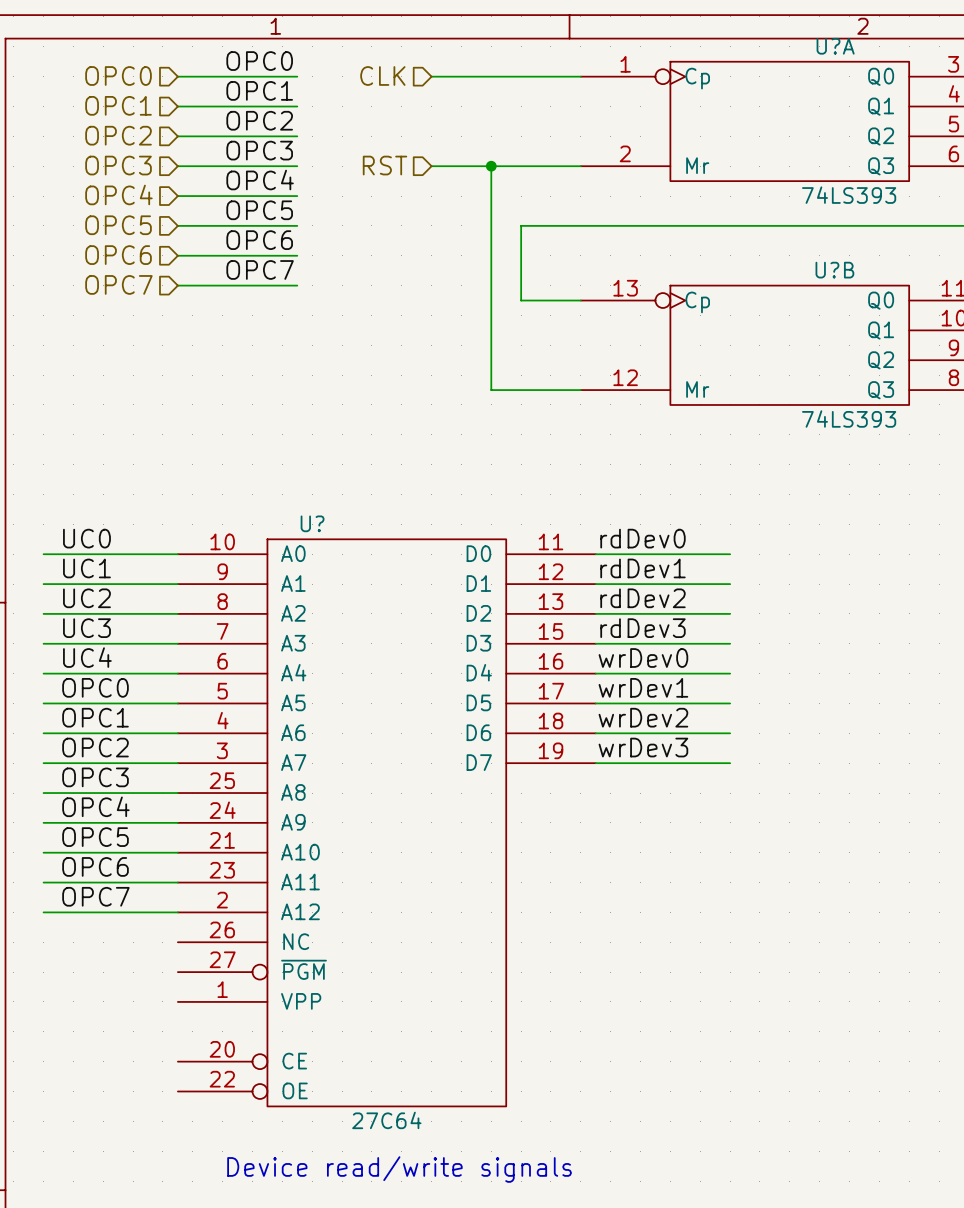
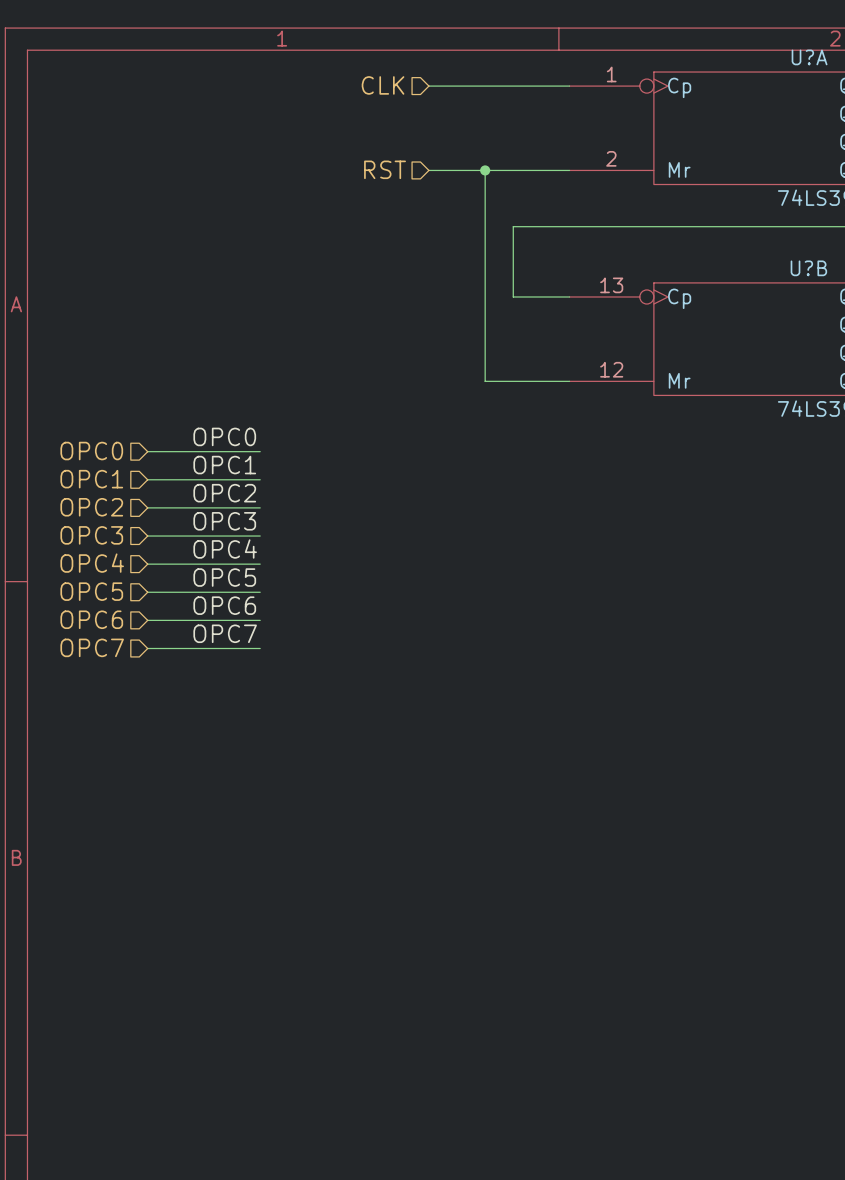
label: OPC0 (259, 61) -> none
hierarchical label: OPC0 (118, 75) -> none
wire: (177, 76) (297, 76) -> none
label: OPC1 (259, 90) -> none
hierarchical label: OPC1 (118, 105) -> none
wire: (177, 106) (297, 106) -> none
label: OPC2 (259, 120) -> none
hierarchical label: OPC2 (118, 135) -> none
wire: (177, 136) (297, 136) -> none
label: OPC3 (259, 150) -> none
hierarchical label: OPC3 (118, 165) -> none
wire: (177, 166) (297, 166) -> none
label: OPC4 (260, 180) -> none
hierarchical label: OPC4 (118, 194) -> none
wire: (177, 196) (297, 196) -> none
label: OPC5 (259, 210) -> none
hierarchical label: OPC5 (118, 225) -> none
wire: (177, 225) (297, 225) -> (147, 451) (260, 451)
label: OPC6 (259, 240) -> none
hierarchical label: OPC6 (118, 255) -> none
wire: (177, 255) (297, 255) -> (147, 479) (260, 479)
label: OPC7 (260, 269) -> none
hierarchical label: OPC7 (118, 284) -> none
wire: (177, 285) (297, 285) -> (147, 507) (260, 507)
label: none -> OPC0 (224, 436)
hierarchical label: none -> OPC0 (91, 451)
label: none -> OPC1 (224, 465)
hierarchical label: none -> OPC1 (91, 479)
label: none -> OPC2 (224, 493)
hierarchical label: none -> OPC2 (91, 507)
label: UC0 (86, 538) -> none
label: none -> OPC3 (224, 521)
label: rdDev0 (642, 538) -> none
hierarchical label: none -> OPC3 (91, 535)
wire: (43, 554) (133, 554) -> none
wire: (595, 554) (730, 554) -> none
label: UC1 (86, 568) -> none
label: none -> OPC4 (225, 549)
label: rdDev1 (642, 568) -> none
hierarchical label: none -> OPC4 (92, 563)
wire: (43, 584) (133, 584) -> none
wire: (595, 584) (730, 584) -> none
label: UC2 (86, 598) -> none
label: none -> OPC5 (224, 577)
label: rdDev2 (642, 598) -> none
wire: (43, 613) (133, 613) -> none
hierarchical label: none -> OPC5 (91, 591)
wire: (595, 613) (730, 613) -> none
label: UC3 (86, 628) -> none
label: none -> OPC6 (224, 605)
label: rdDev3 (642, 628) -> none
wire: (43, 643) (133, 643) -> none
hierarchical label: none -> OPC6 (91, 619)
wire: (595, 643) (730, 643) -> none
label: UC4 (87, 657) -> none
label: none -> OPC7 (225, 633)
label: wrDev0 (643, 658) -> none
hierarchical label: none -> OPC7 (92, 647)
wire: (43, 673) (133, 673) -> none
wire: (595, 673) (730, 673) -> none
label: OPC0 (95, 687) -> none
label: wrDev1 (643, 687) -> none
wire: (43, 703) (177, 703) -> none
wire: (595, 703) (730, 703) -> none
label: OPC1 (95, 717) -> none
label: wrDev2 (643, 717) -> none
wire: (43, 733) (177, 733) -> none
wire: (595, 733) (730, 733) -> none
label: OPC2 (95, 747) -> none
label: wrDev3 (643, 747) -> none
wire: (43, 763) (177, 763) -> none
wire: (595, 763) (730, 763) -> none
label: OPC3 (95, 777) -> none
wire: (43, 793) (177, 793) -> none
label: OPC4 (95, 806) -> none
wire: (43, 822) (177, 822) -> none
U?: 27C64 (386, 822) -> none
label: OPC5 (95, 837) -> none
wire: (43, 852) (177, 852) -> none
label: OPC6 (95, 866) -> none
wire: (43, 882) (177, 882) -> none
label: OPC7 (95, 896) -> none
wire: (43, 912) (177, 912) -> none
text: Device read/write signals (399, 1169) -> none

